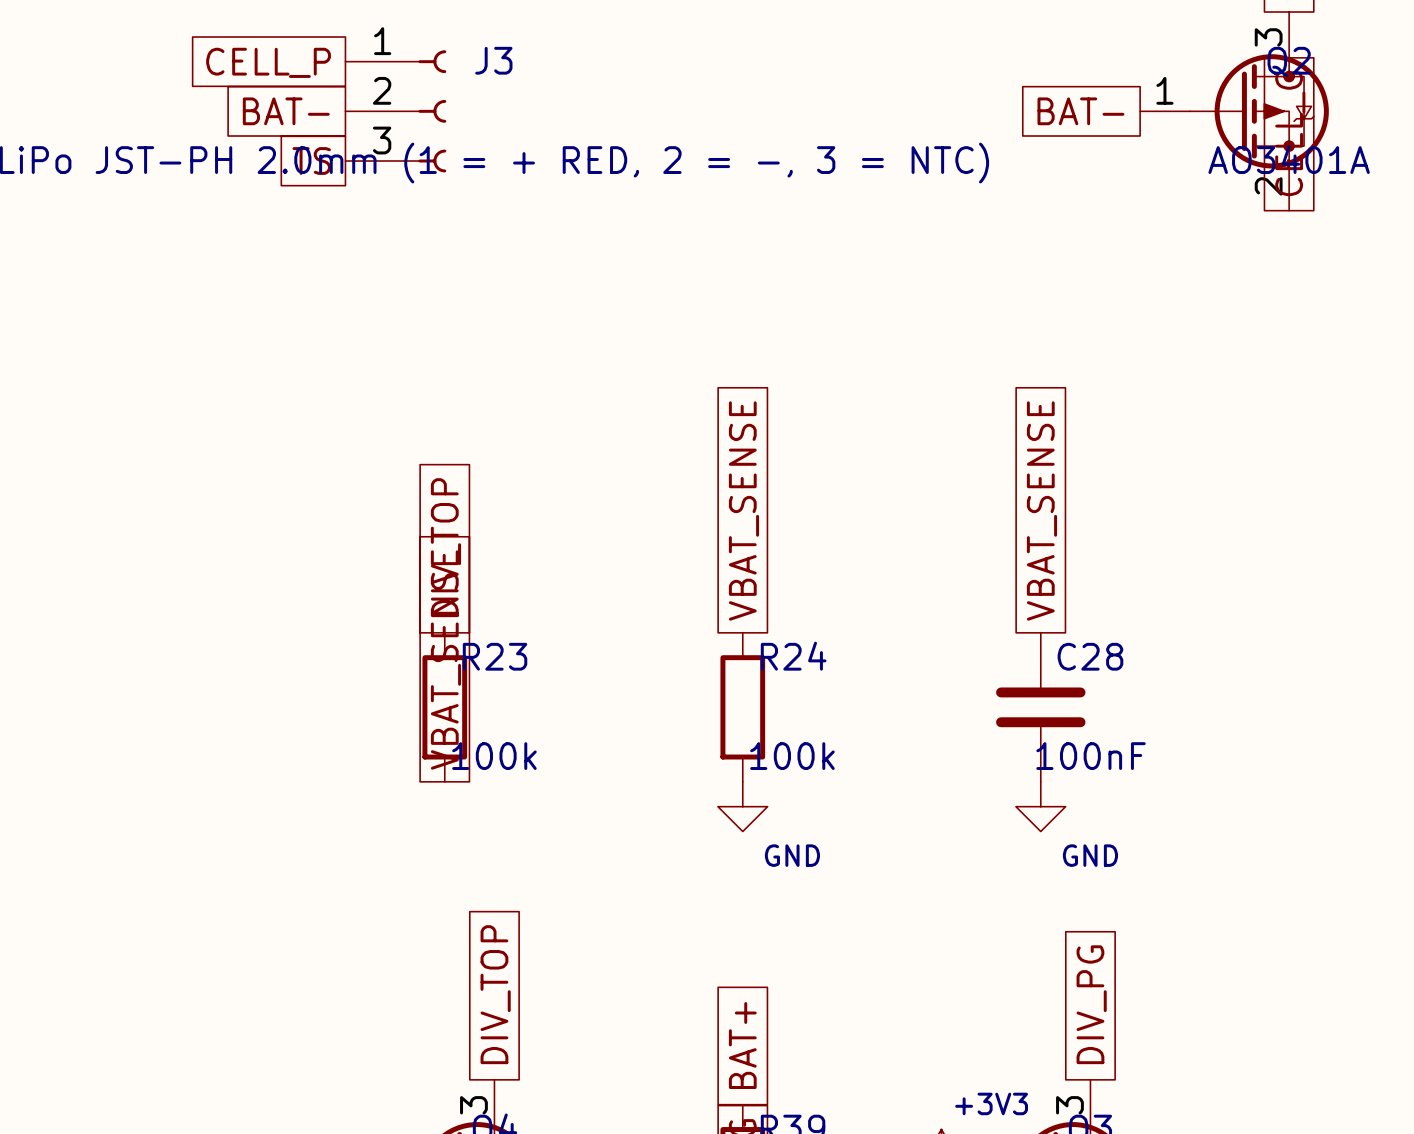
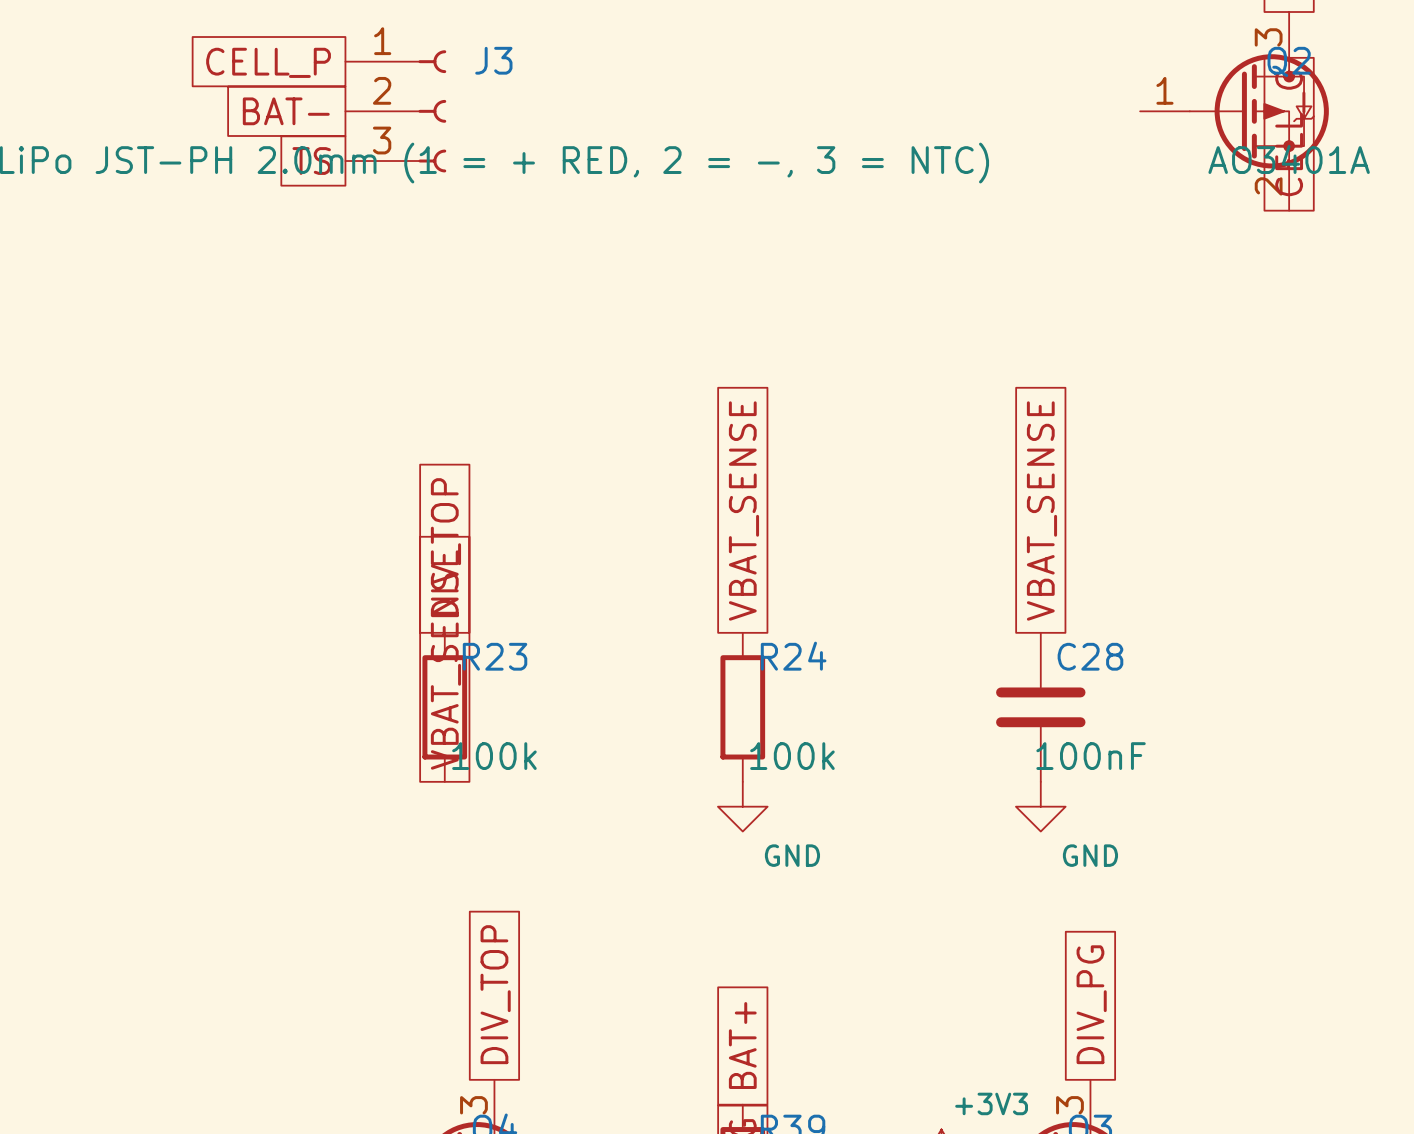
global label: BAT- (1080, 111) -> none

